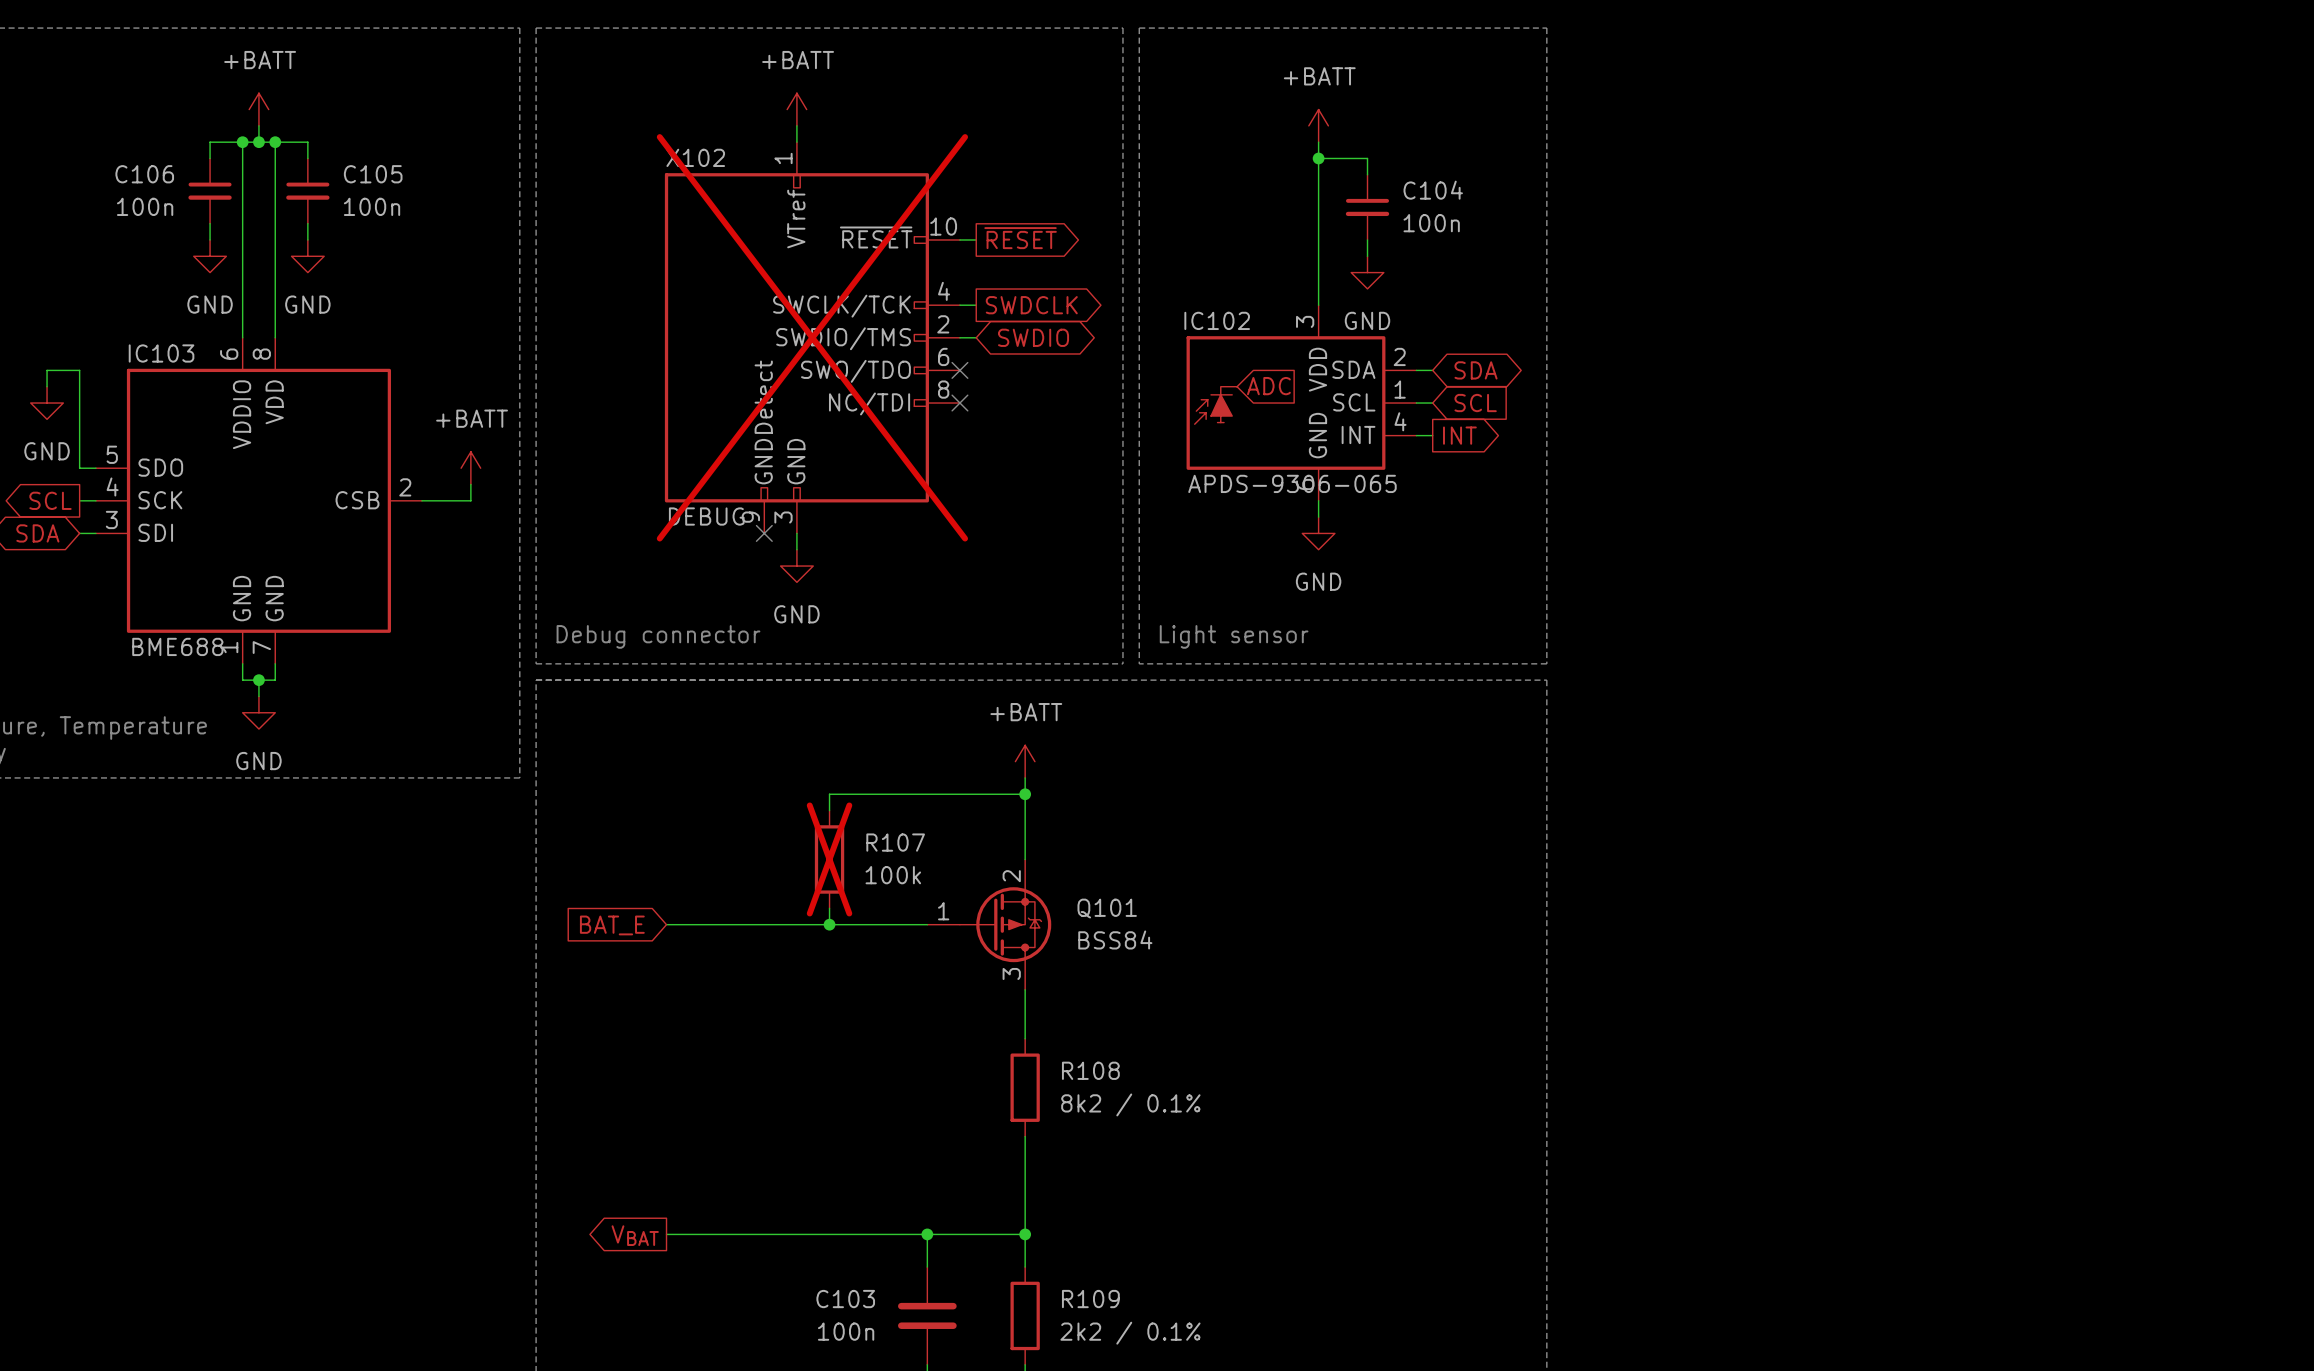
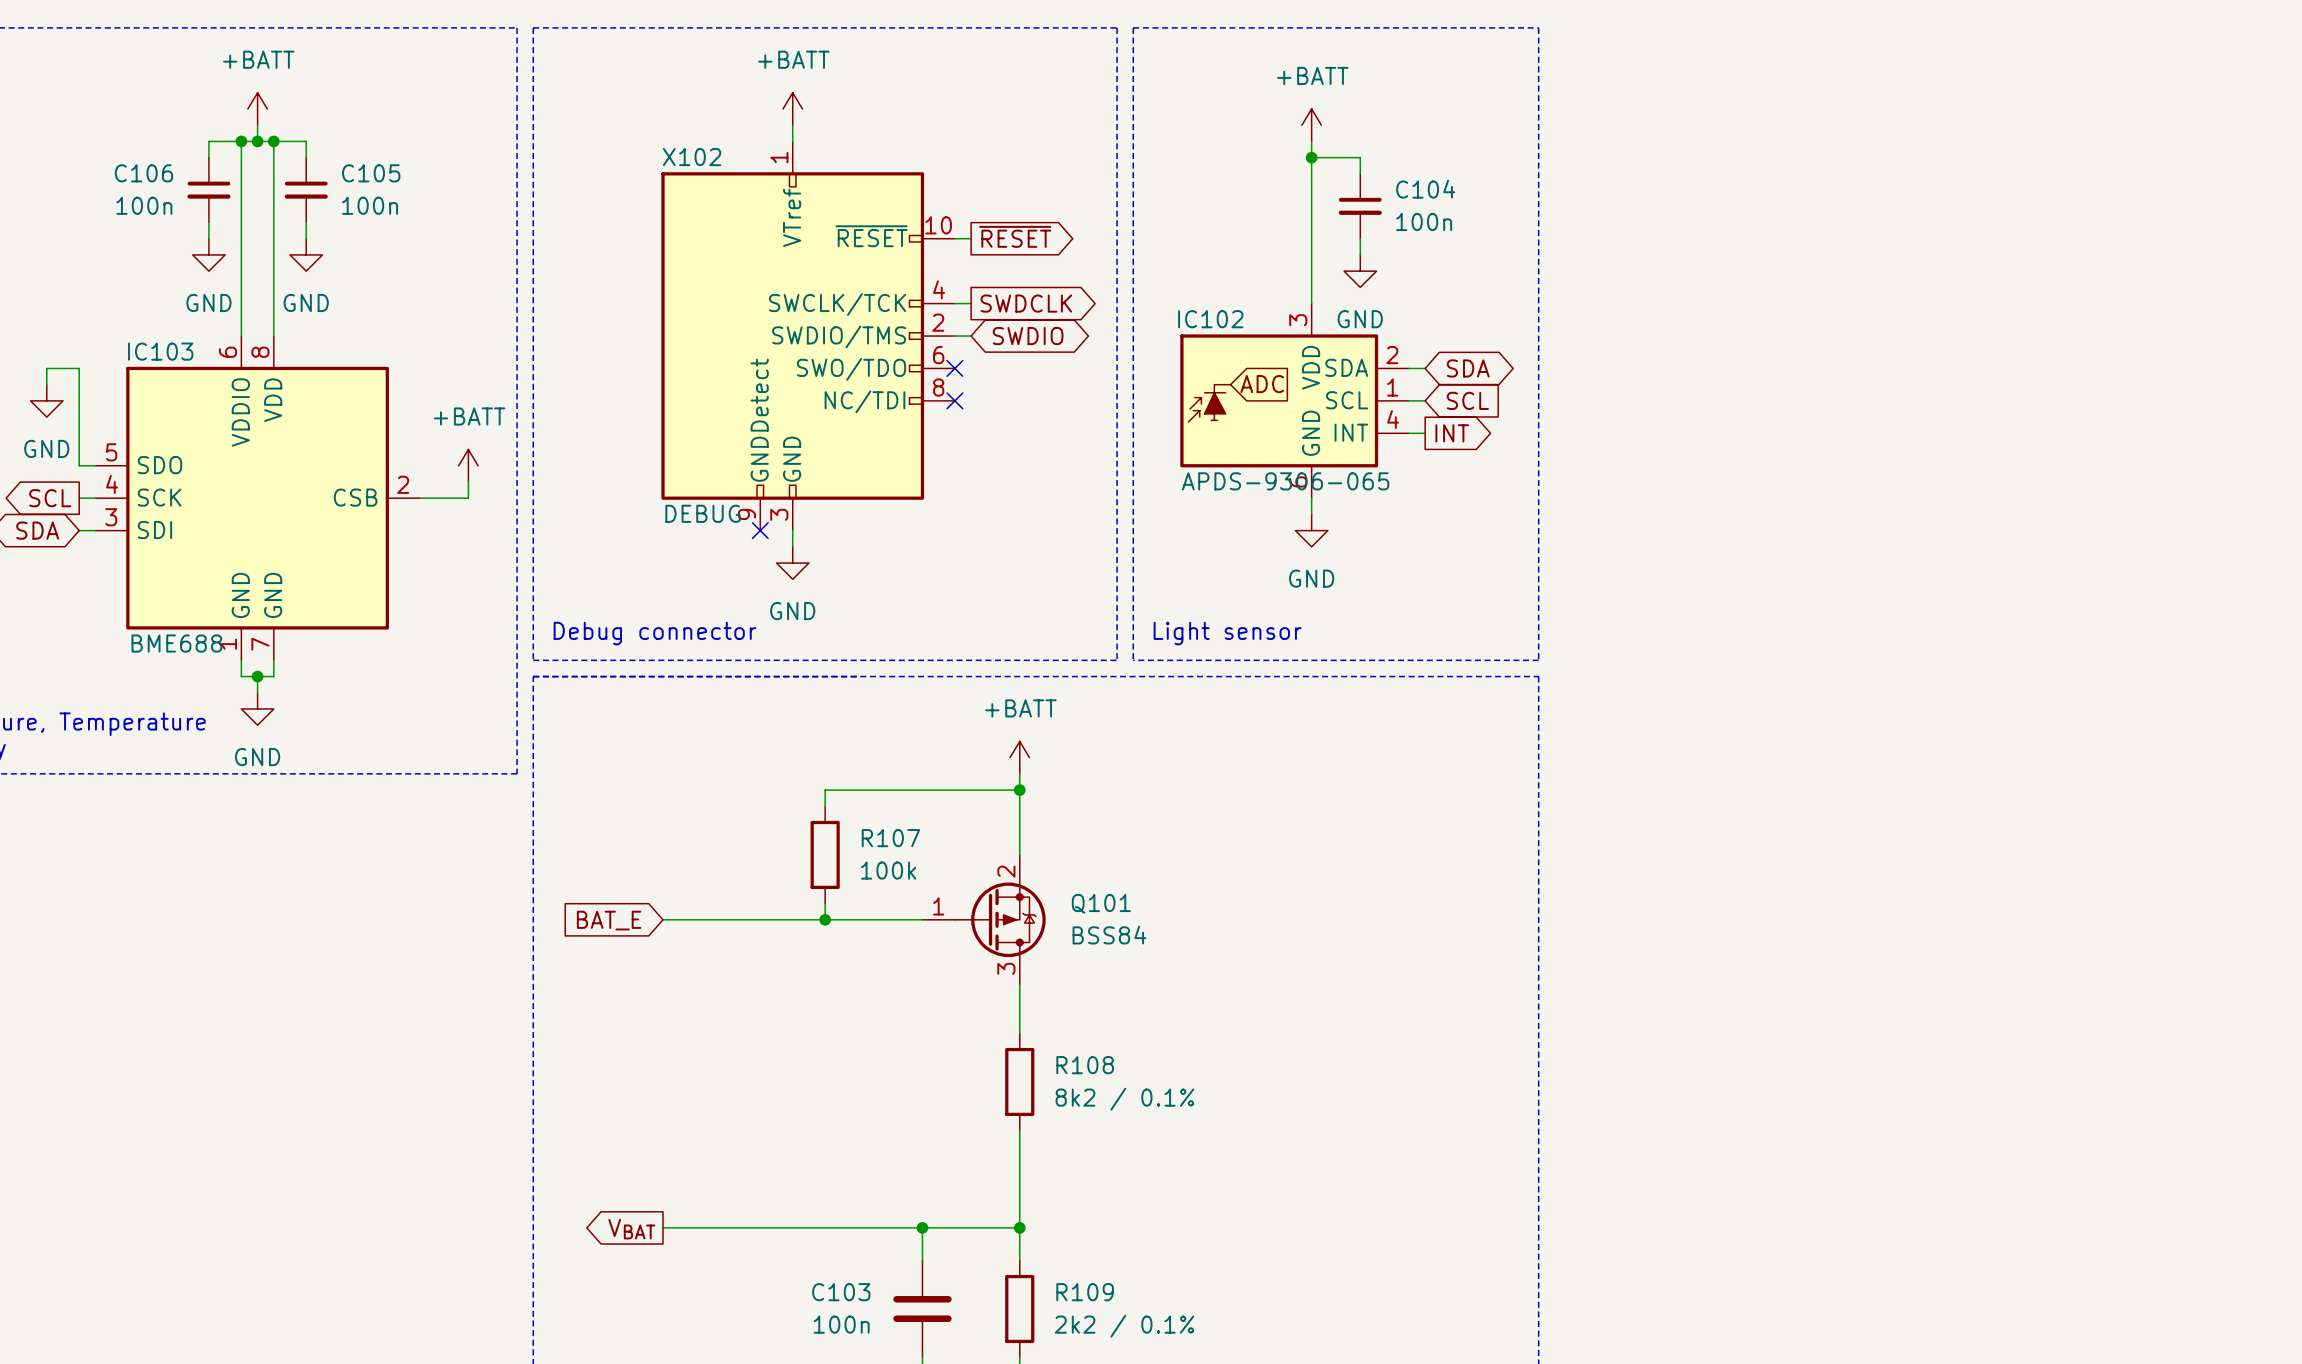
X102 do-not-place cross: (812, 337) -> none
R107 do-not-place cross: (829, 859) -> none

